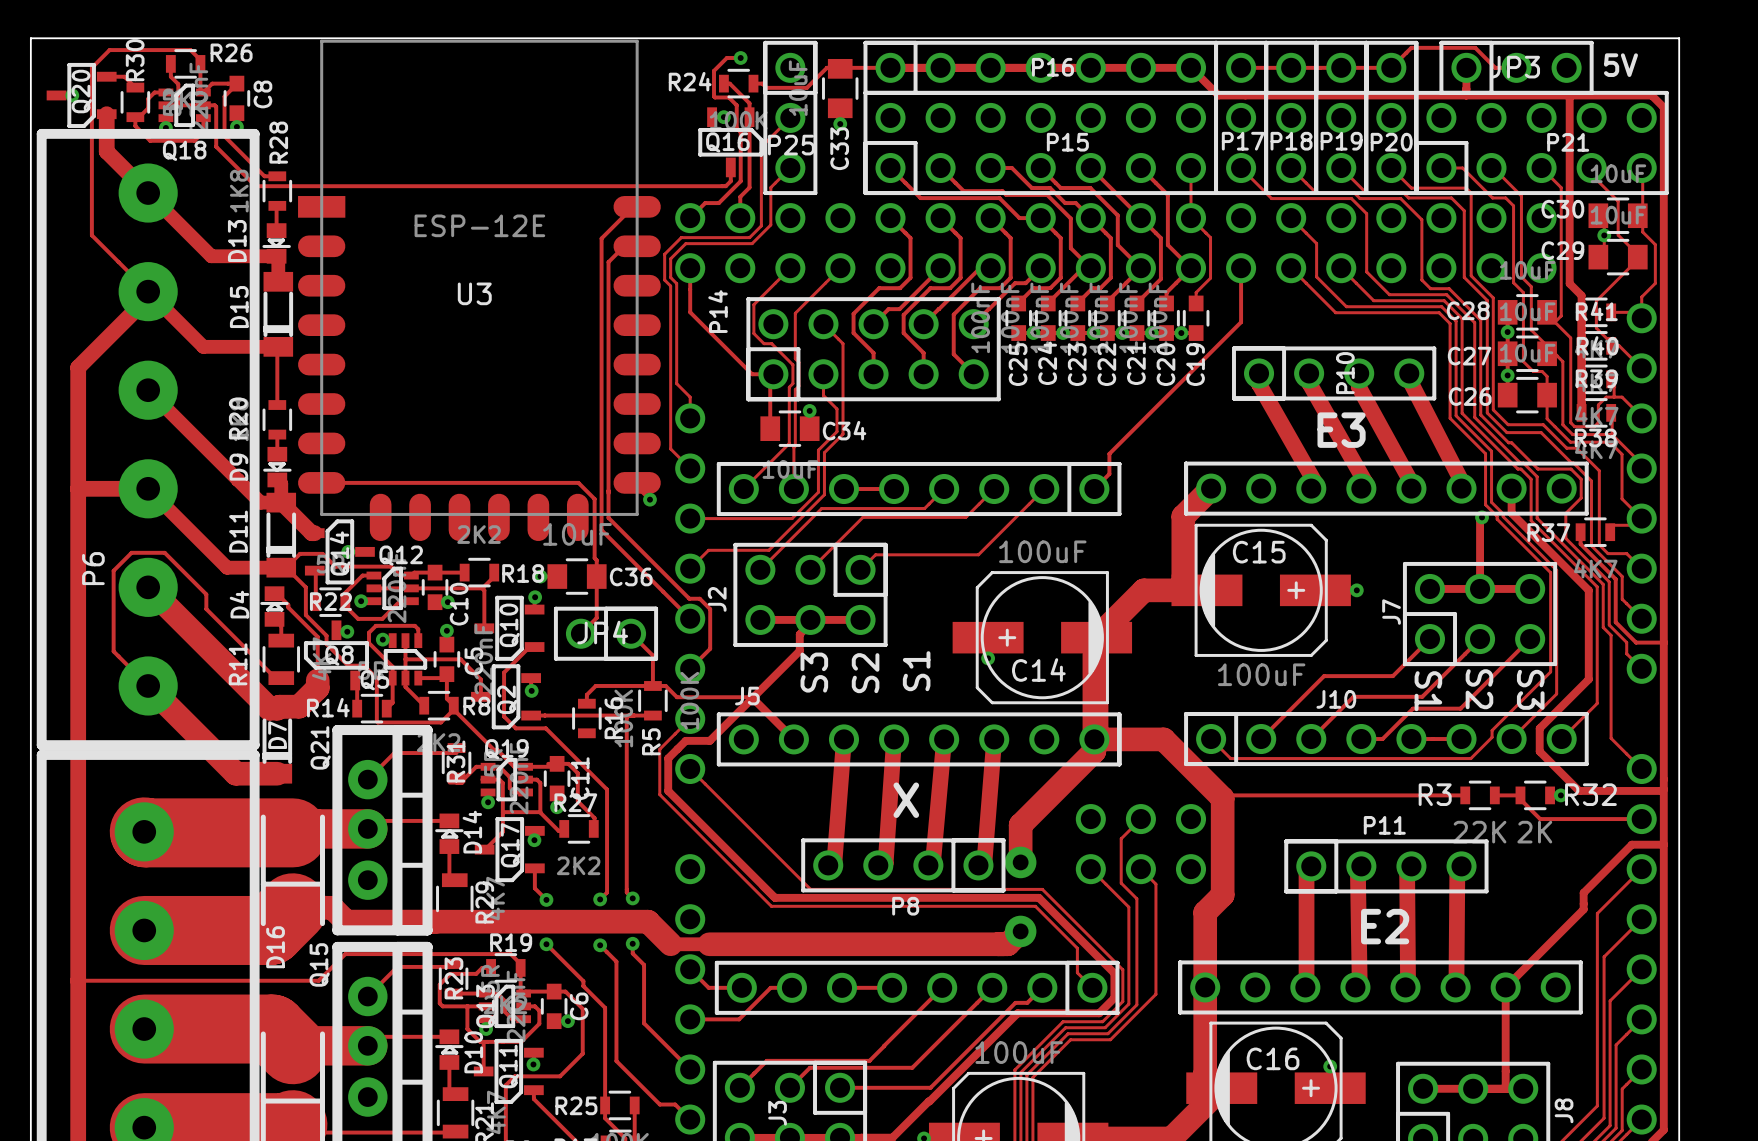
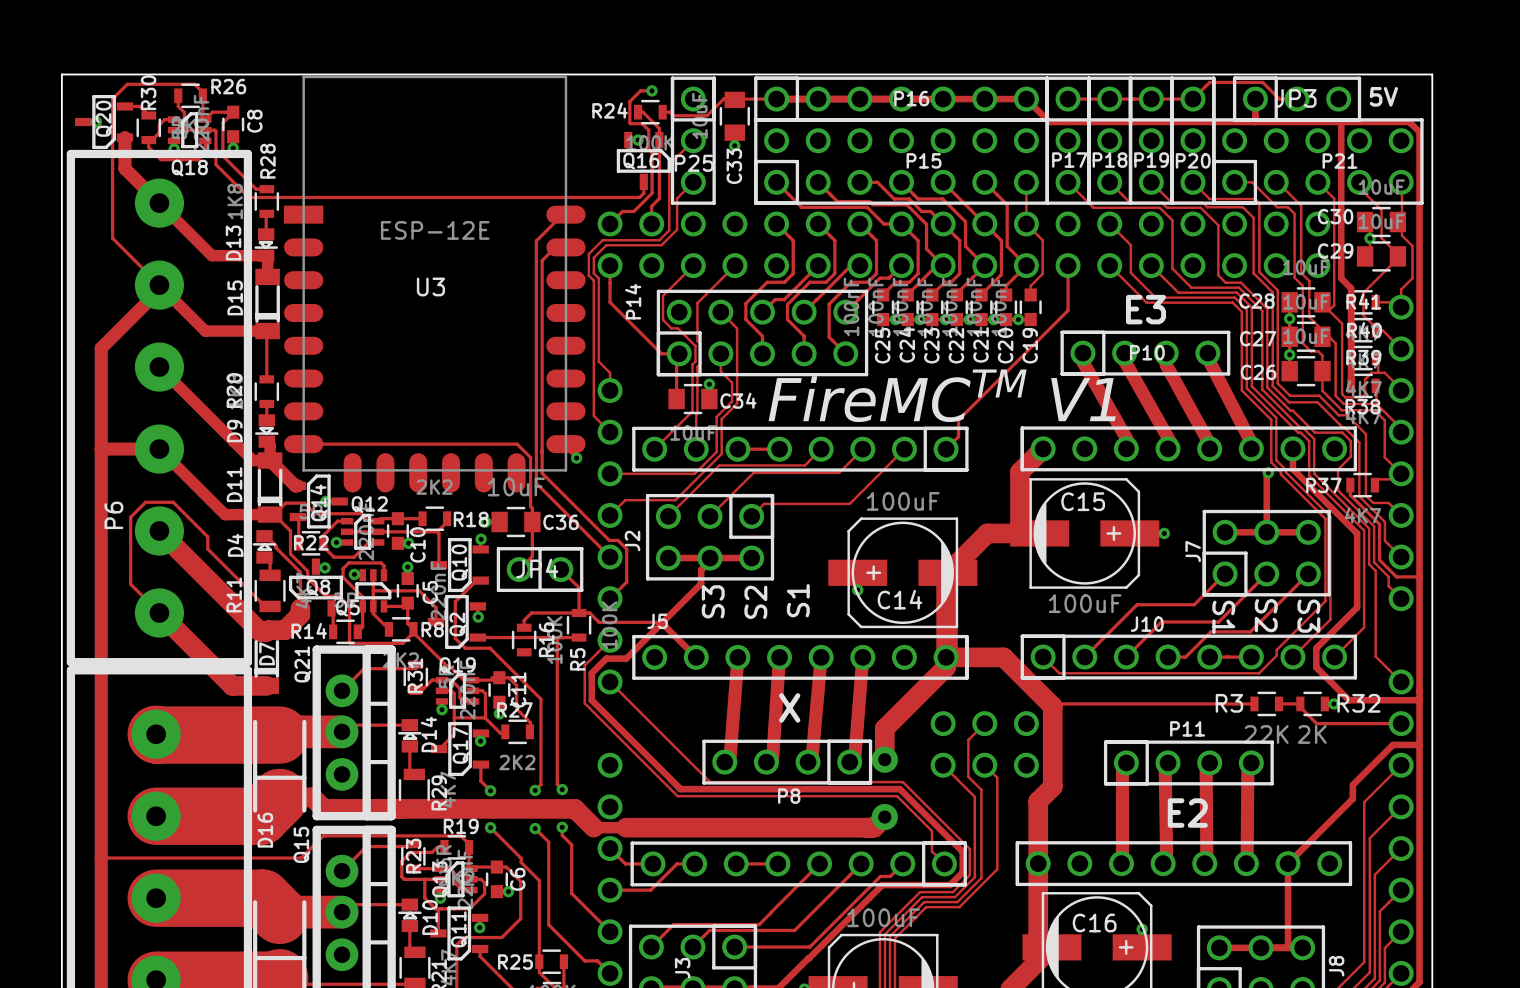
P10 name rotation: 0° (1345, 373) -> 90° clockwise (1147, 352)
drawing: none -> [768, 369, 1116, 423]
text position: E3 (1341, 430) -> E3 (1146, 309)

